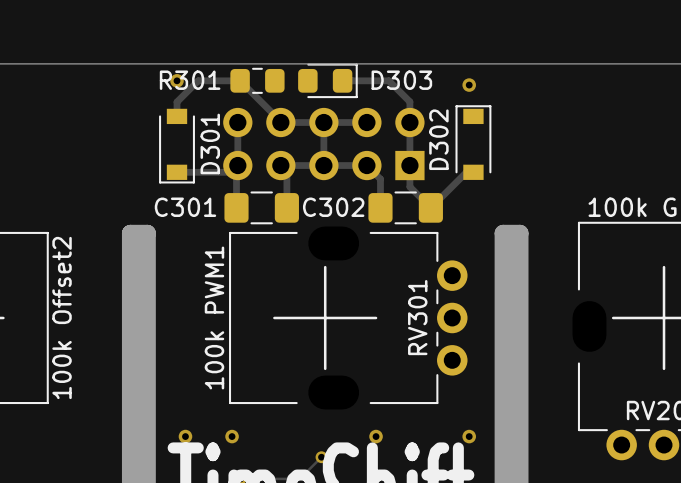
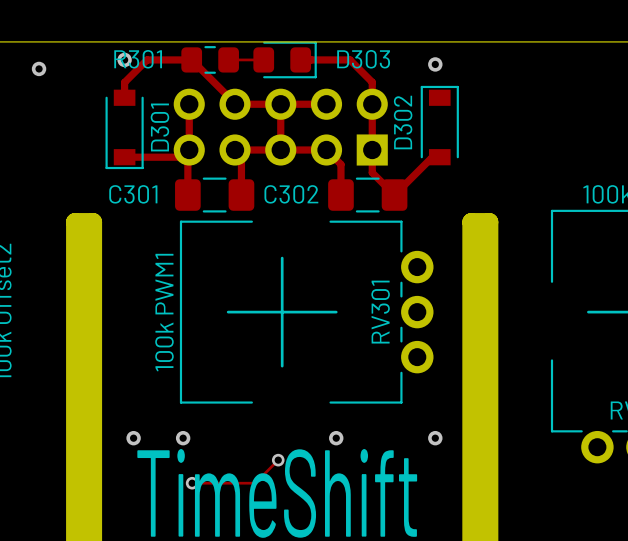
track: none -> (228, 59) (263, 59)
via: none -> (39, 68)

